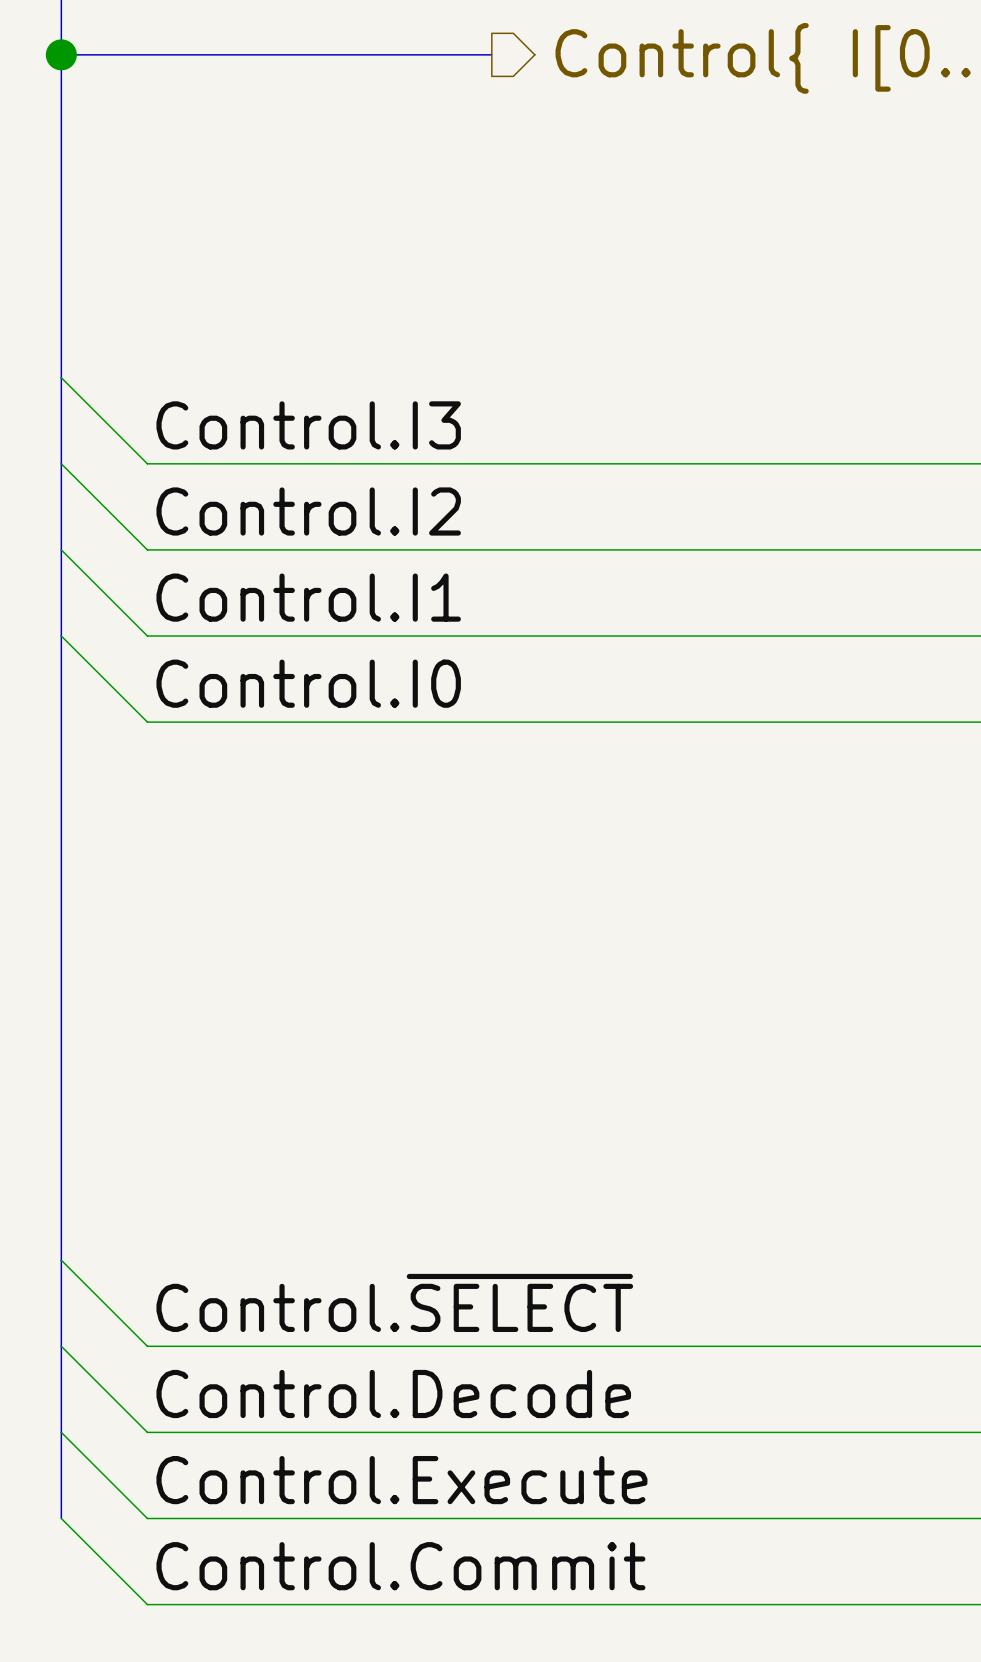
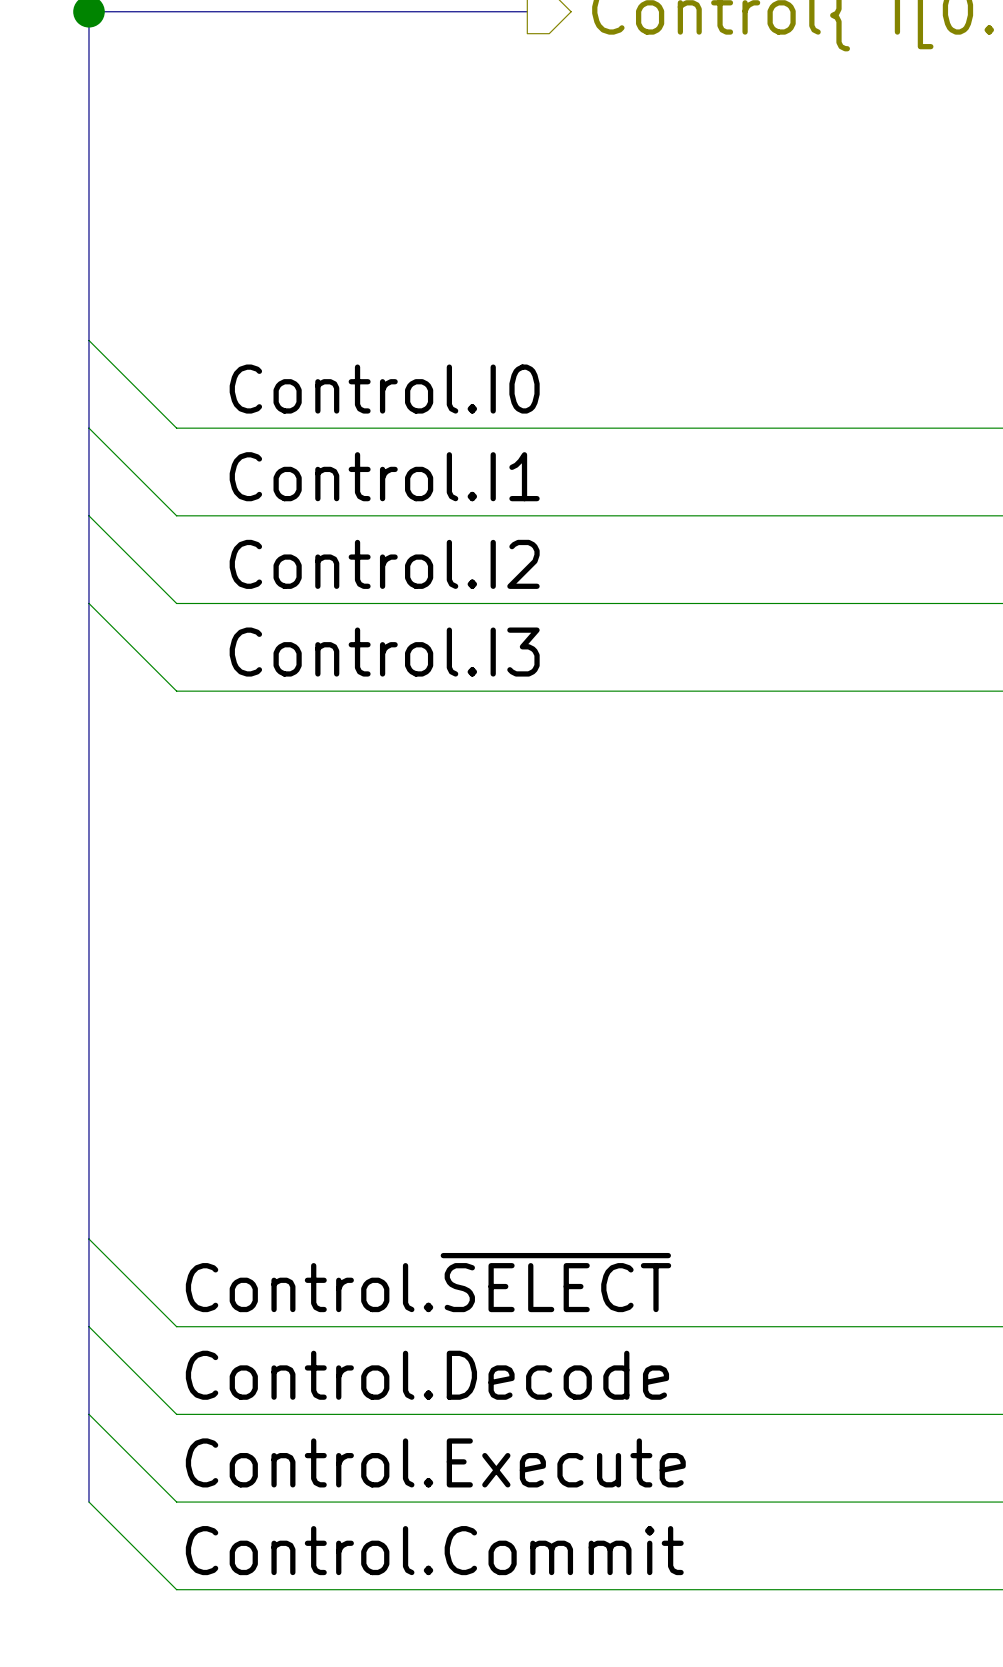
label position: Control.I3 (308, 425) -> Control.I3 (384, 652)
label position: Control.I2 (308, 511) -> Control.I2 (384, 564)
label position: Control.I1 (308, 597) -> Control.I1 (384, 476)
label position: Control.I0 (308, 683) -> Control.I0 (384, 389)

